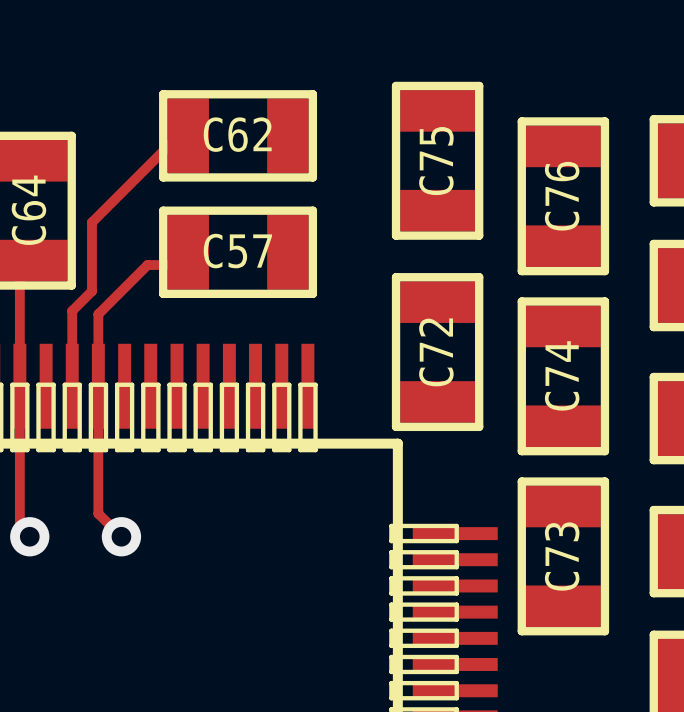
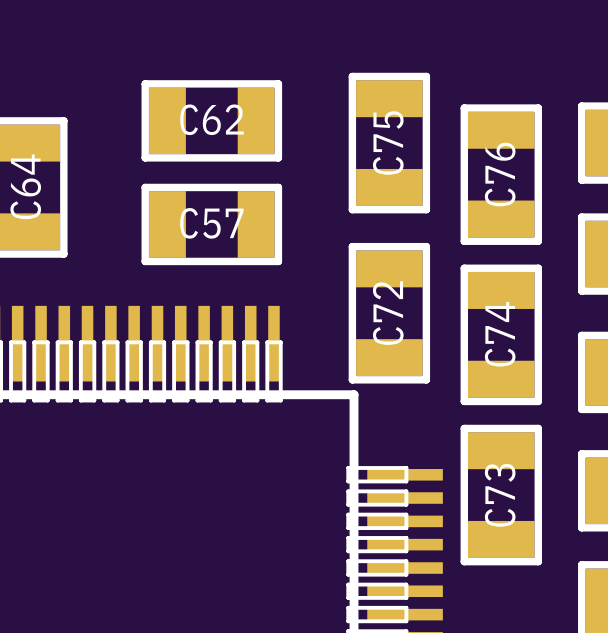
track: (188, 135) (178, 135) (91, 222) (91, 291) (72, 310) (72, 386) -> none
track: (188, 252) (175, 265) (147, 265) (98, 314) (98, 513) (121, 536) -> none
track: (30, 260) (19, 270) (19, 526) (29, 536) -> none
via: (29, 536) -> none
via: (121, 536) -> none

